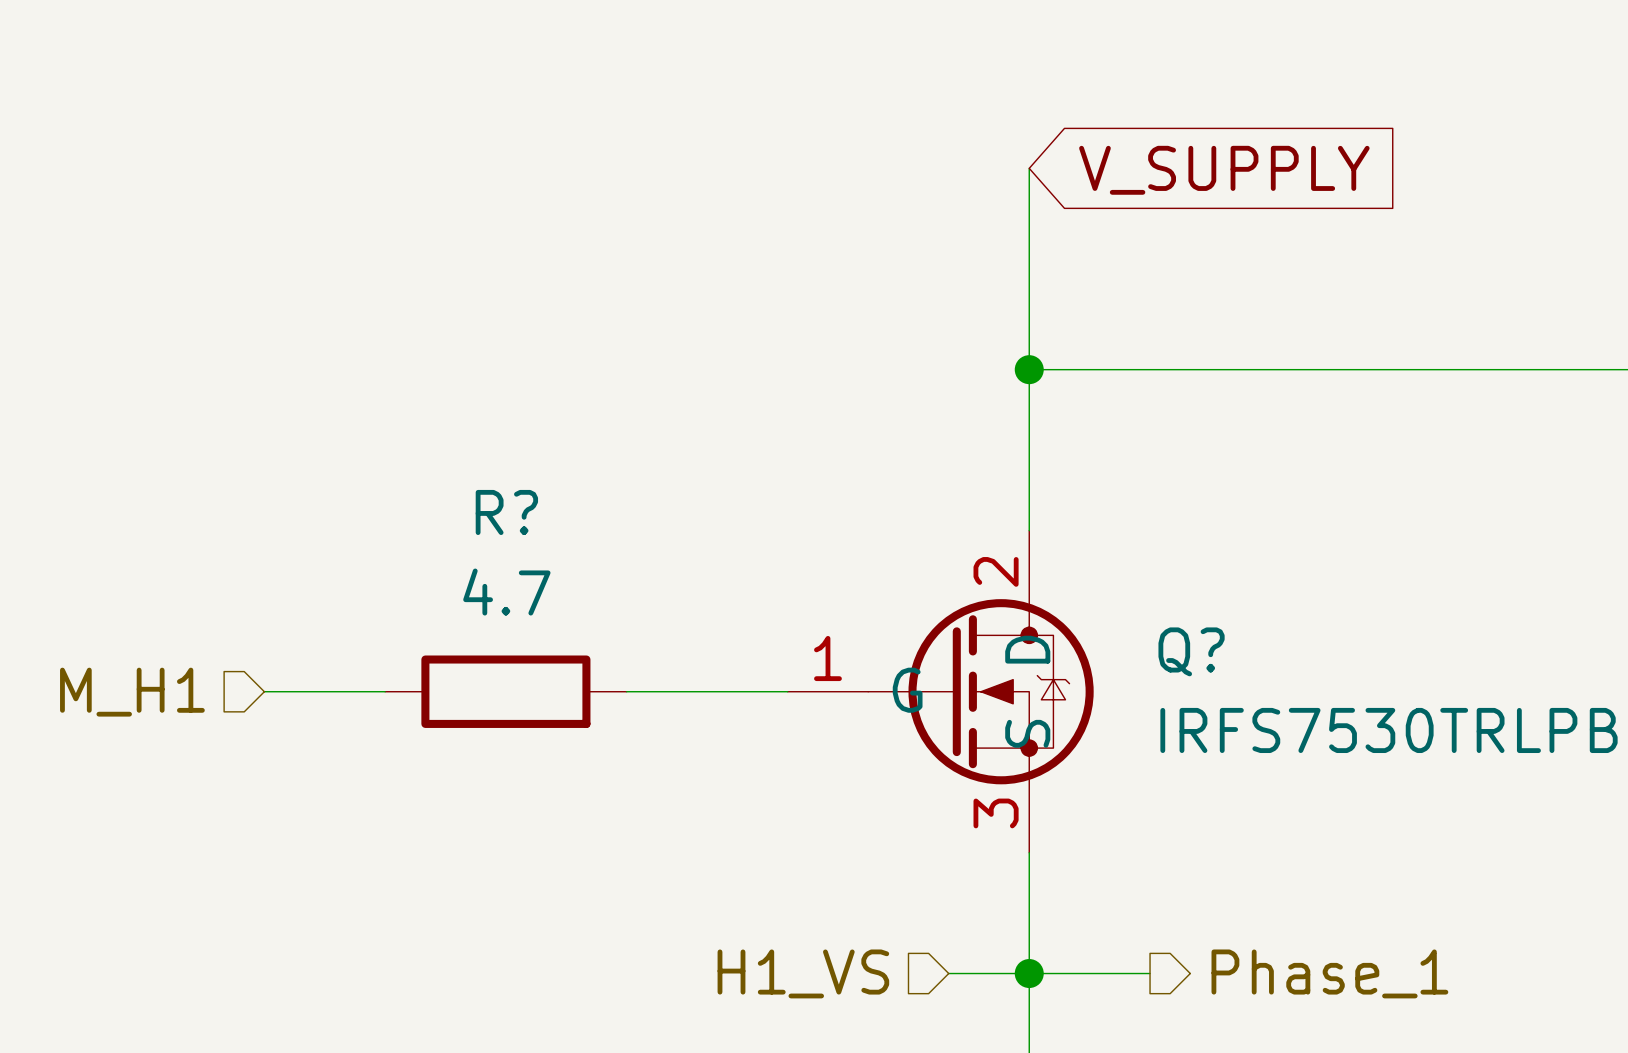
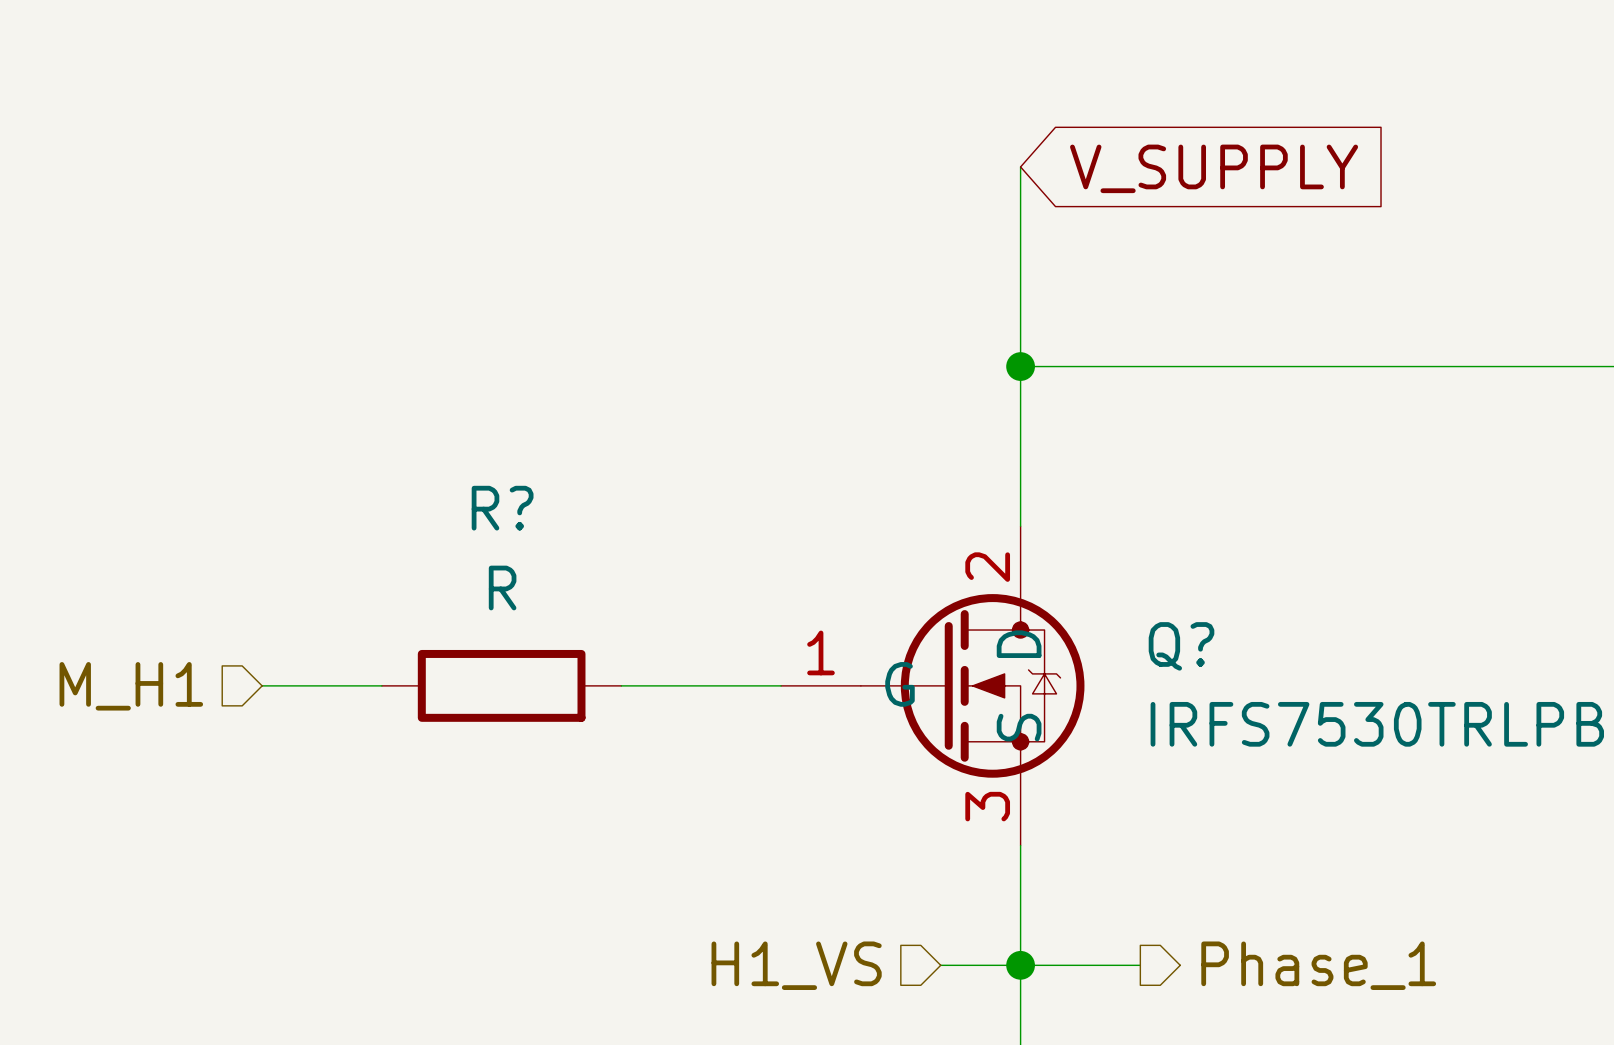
R? value: 4.7 (506, 592) -> R (502, 588)

